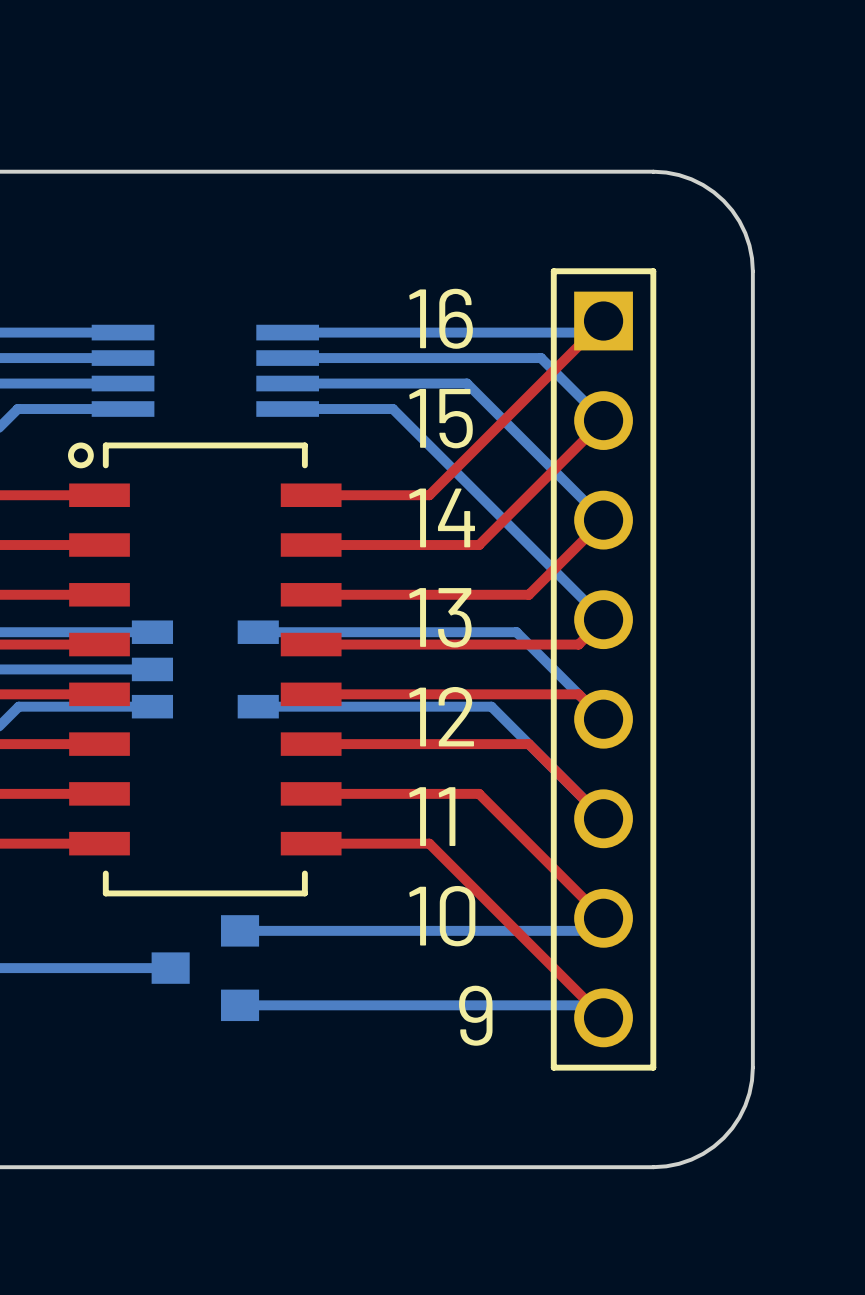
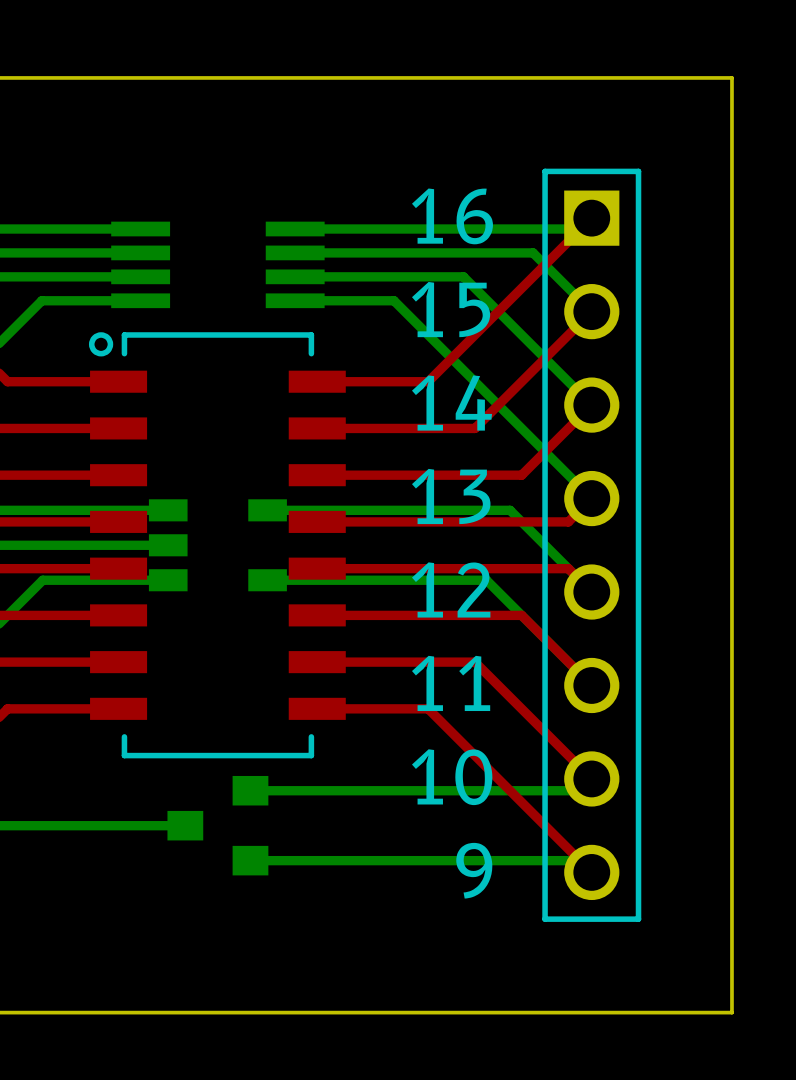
board edge: (653, 171) (679, 175) (691, 179) (713, 192) (723, 200) (739, 221) (745, 233) (752, 258) (752, 271) -> (638, 77) (731, 77) (731, 171)
board edge: (752, 1067) (752, 1080) (745, 1105) (739, 1117) (723, 1138) (703, 1153) (691, 1159) (666, 1166) (653, 1167) -> (731, 919) (731, 1012) (638, 1012)

